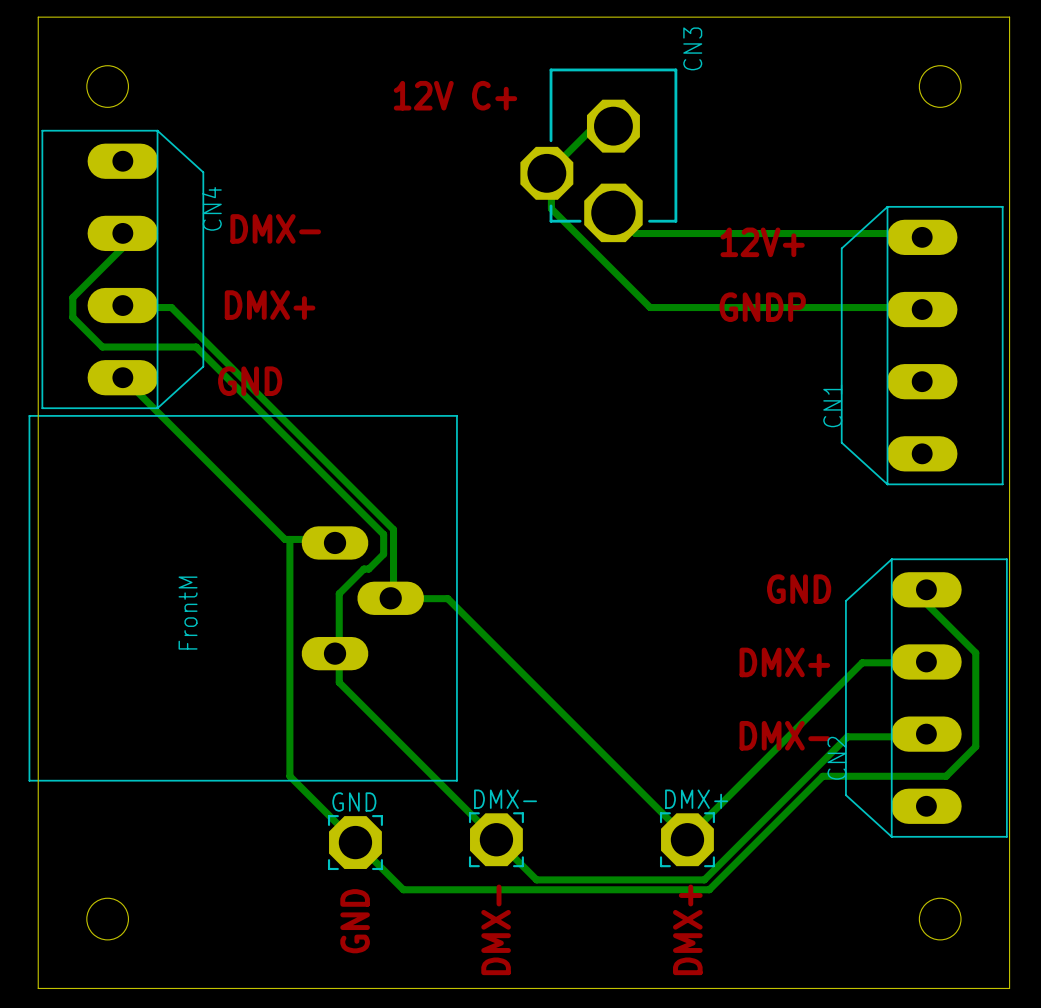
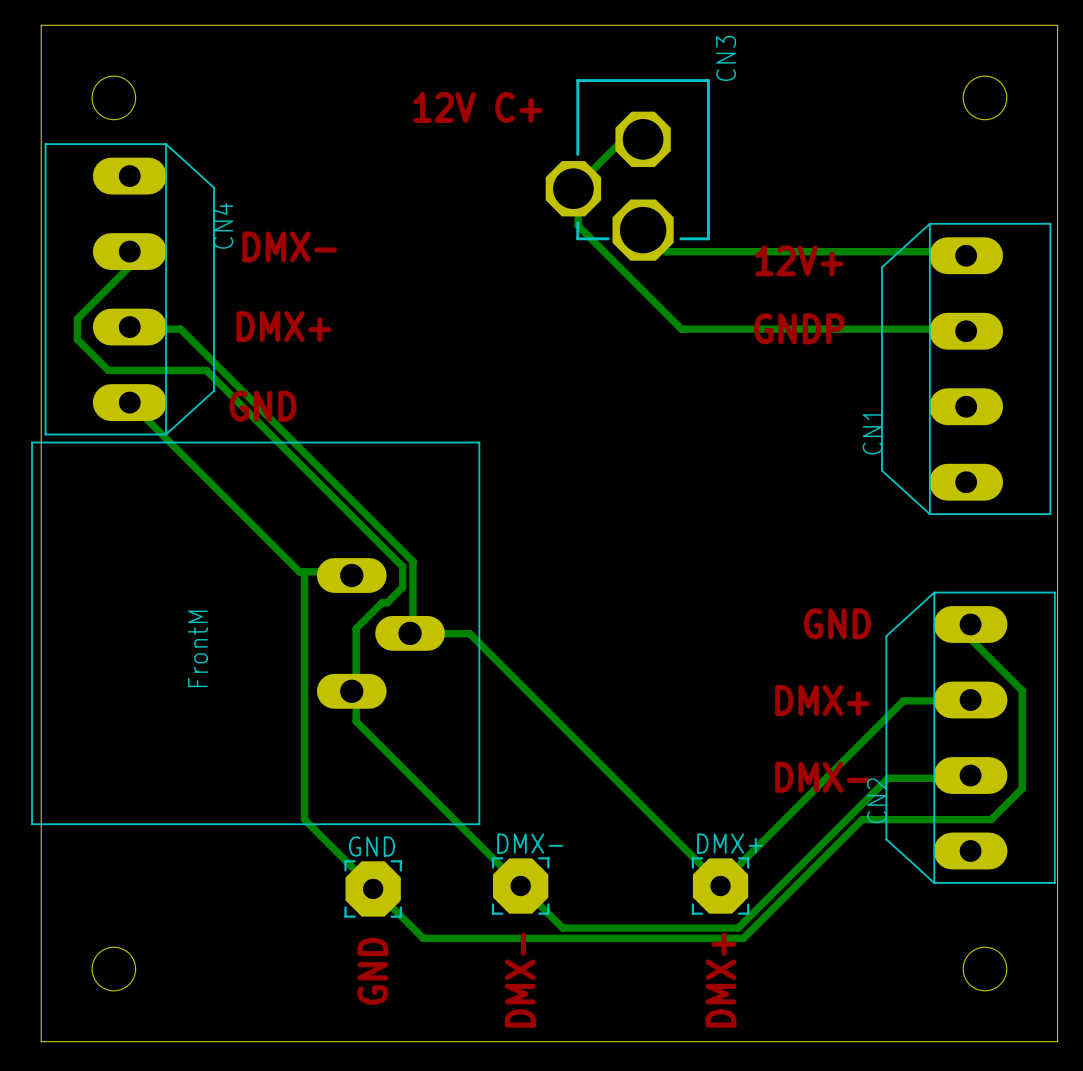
DMX- footprint: [468, 812, 524, 868] -> [491, 857, 550, 915]
DMX+ footprint: [659, 812, 715, 868] -> [691, 857, 750, 915]
GND footprint: [327, 815, 383, 871] -> [344, 860, 402, 918]

